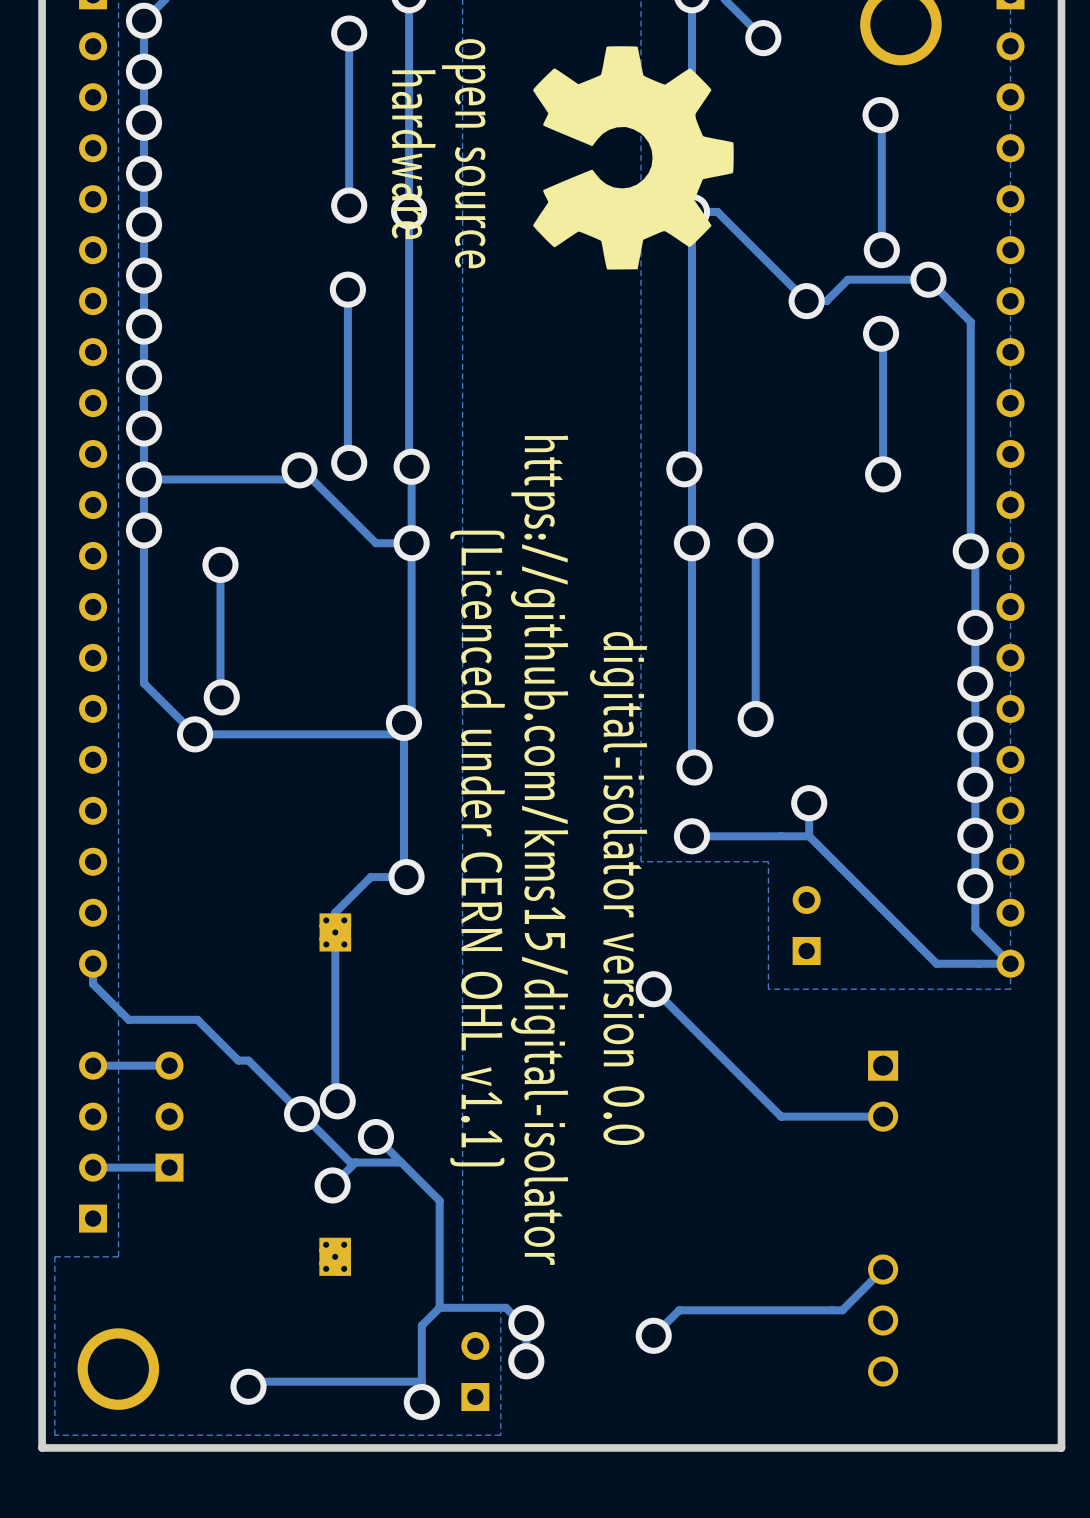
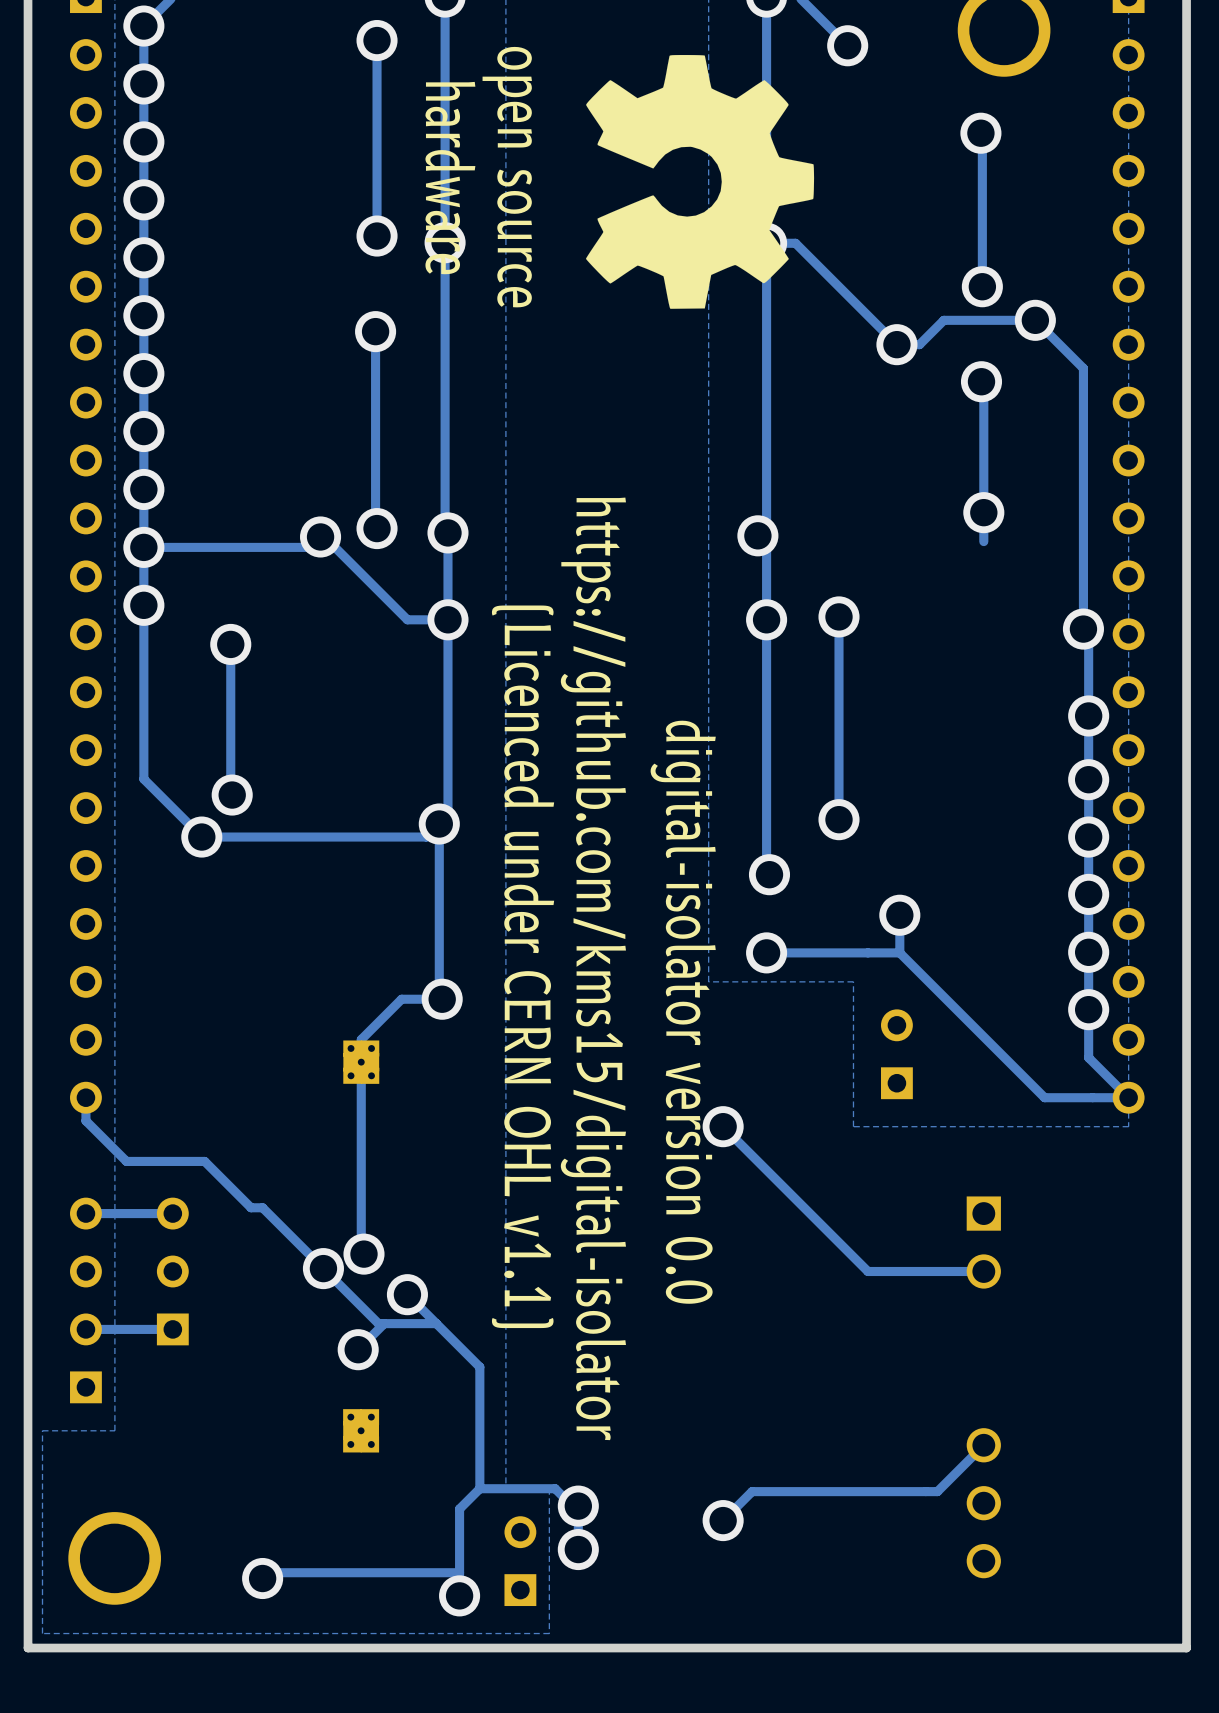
via position: (883, 474) -> (983, 512)

